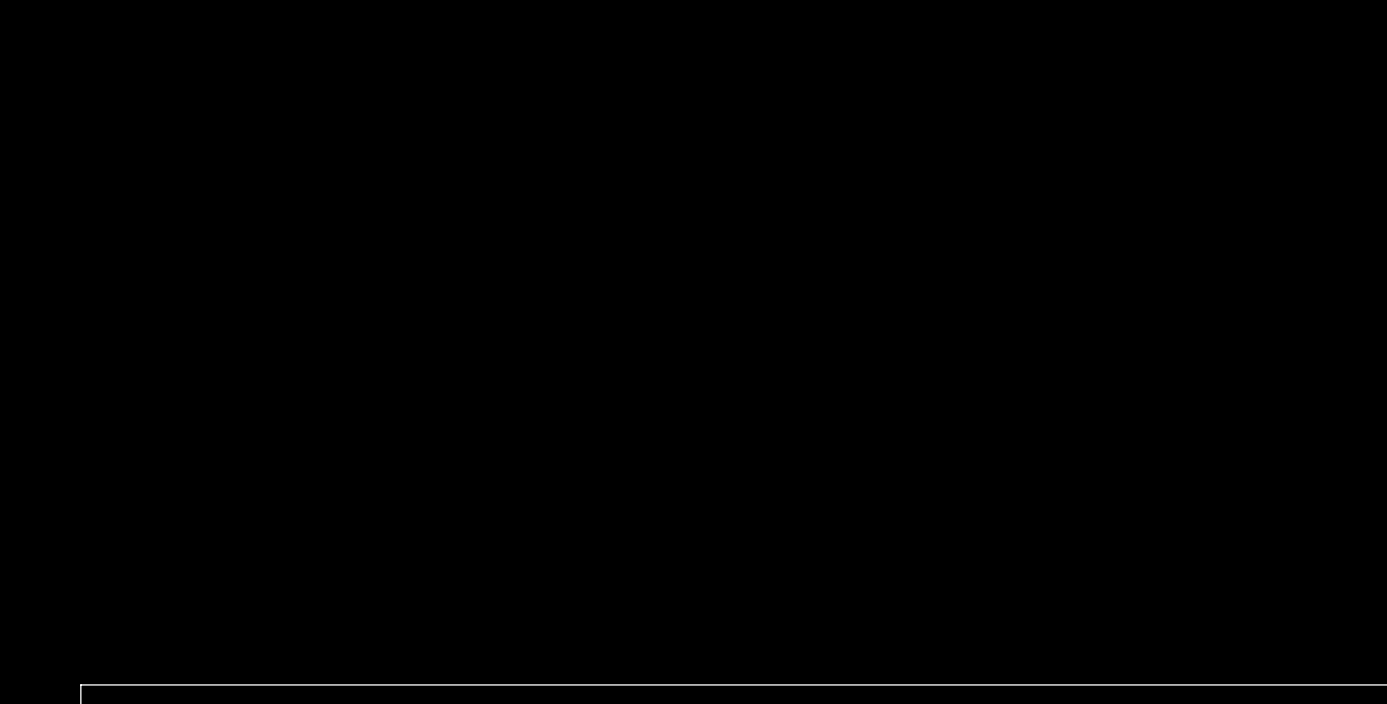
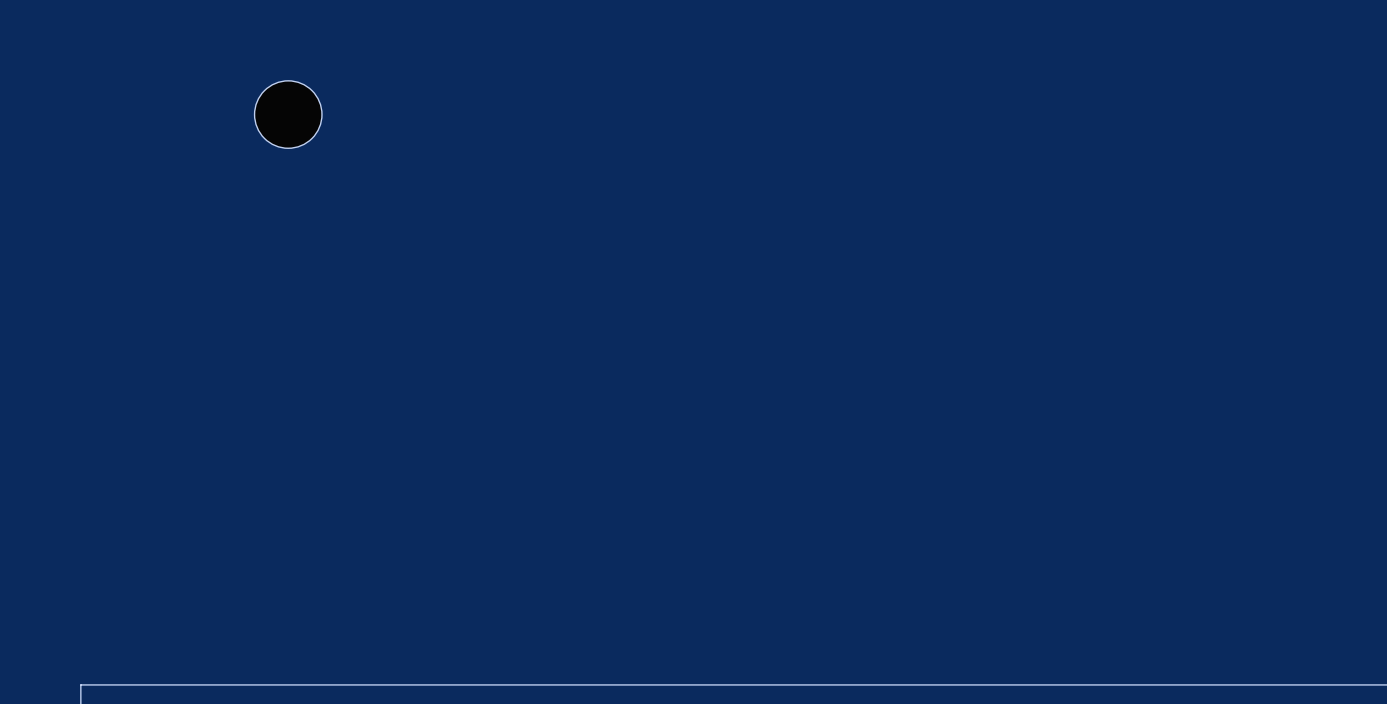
part: none -> (288, 114)

